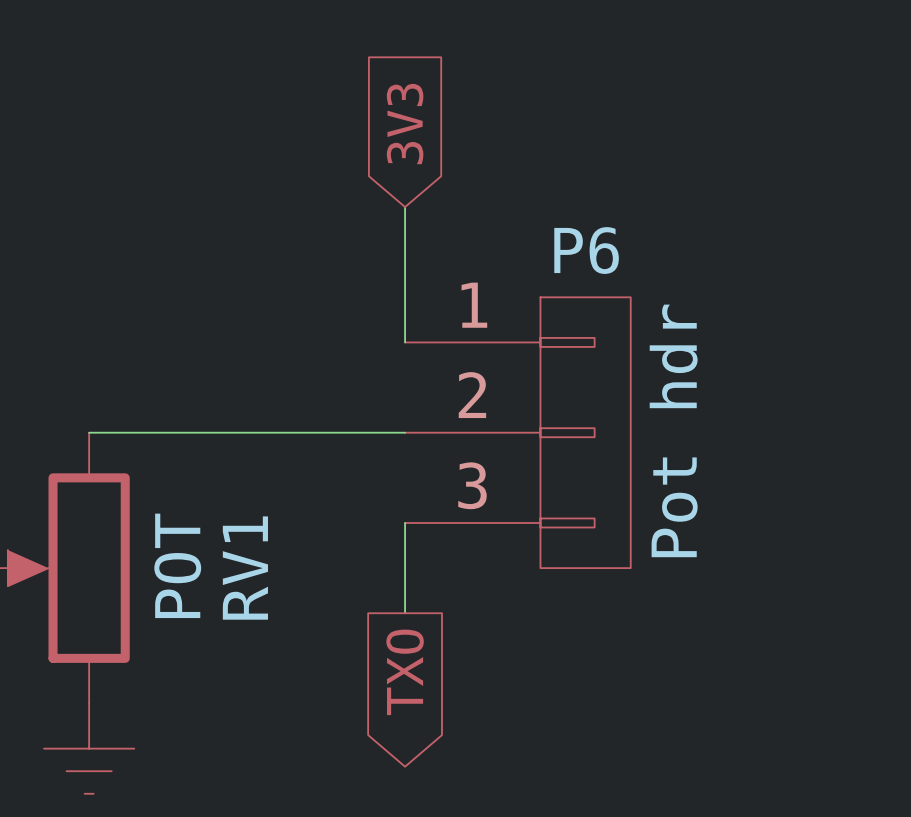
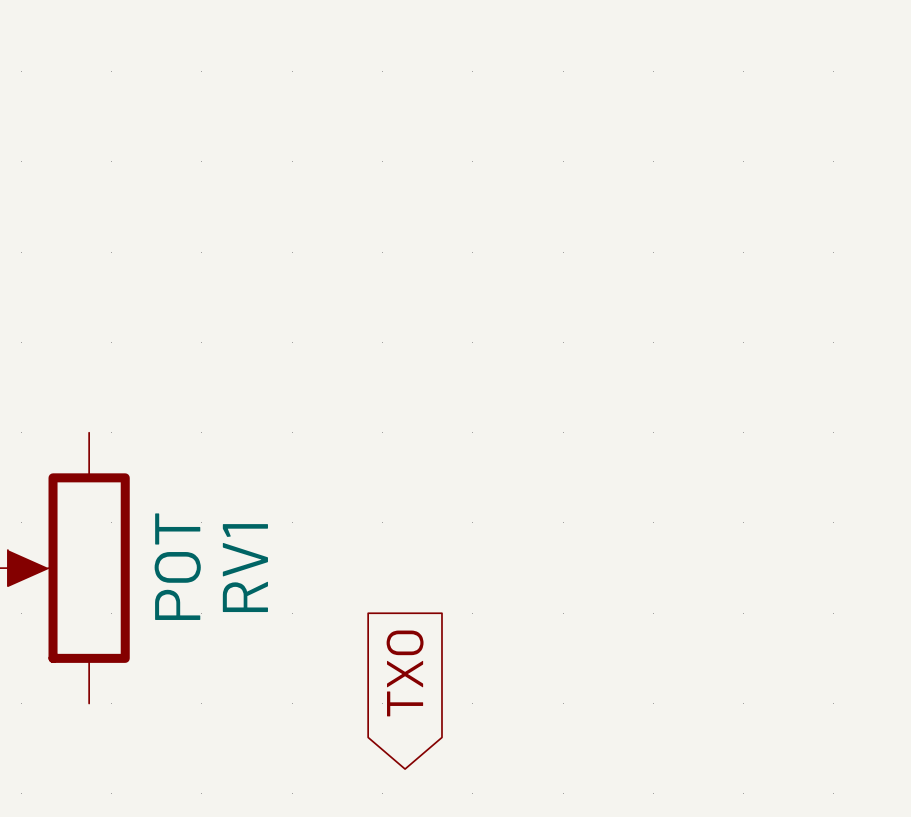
global label: 3V3 (405, 124) -> none
wire: (405, 207) (405, 342) -> none
wire: (89, 432) (405, 432) -> none
P6: Pot hdr (517, 432) -> none
wire: (405, 522) (405, 613) -> none
power symbol: (89, 748) -> none

